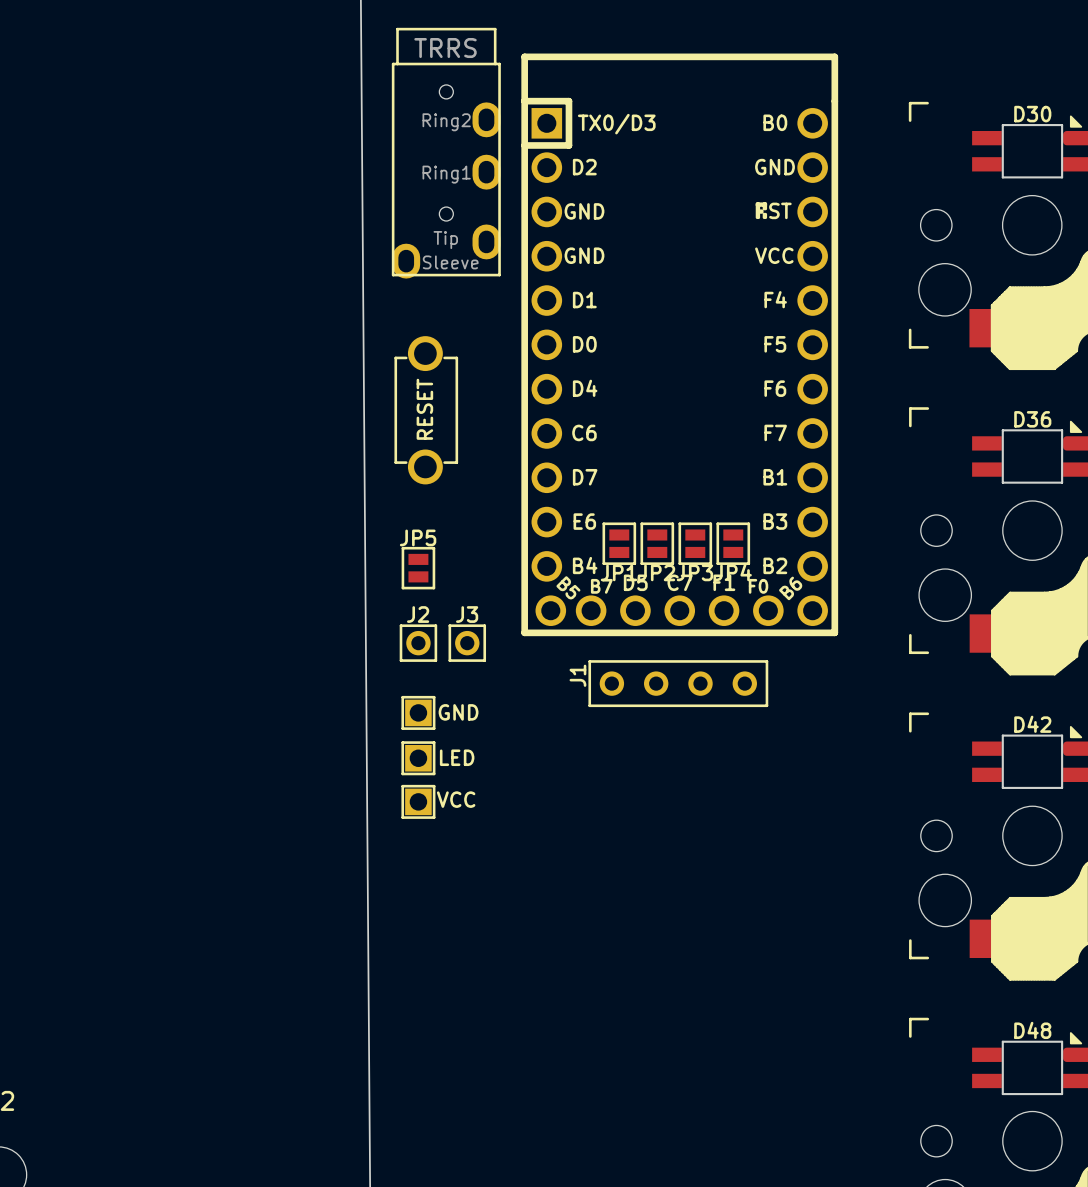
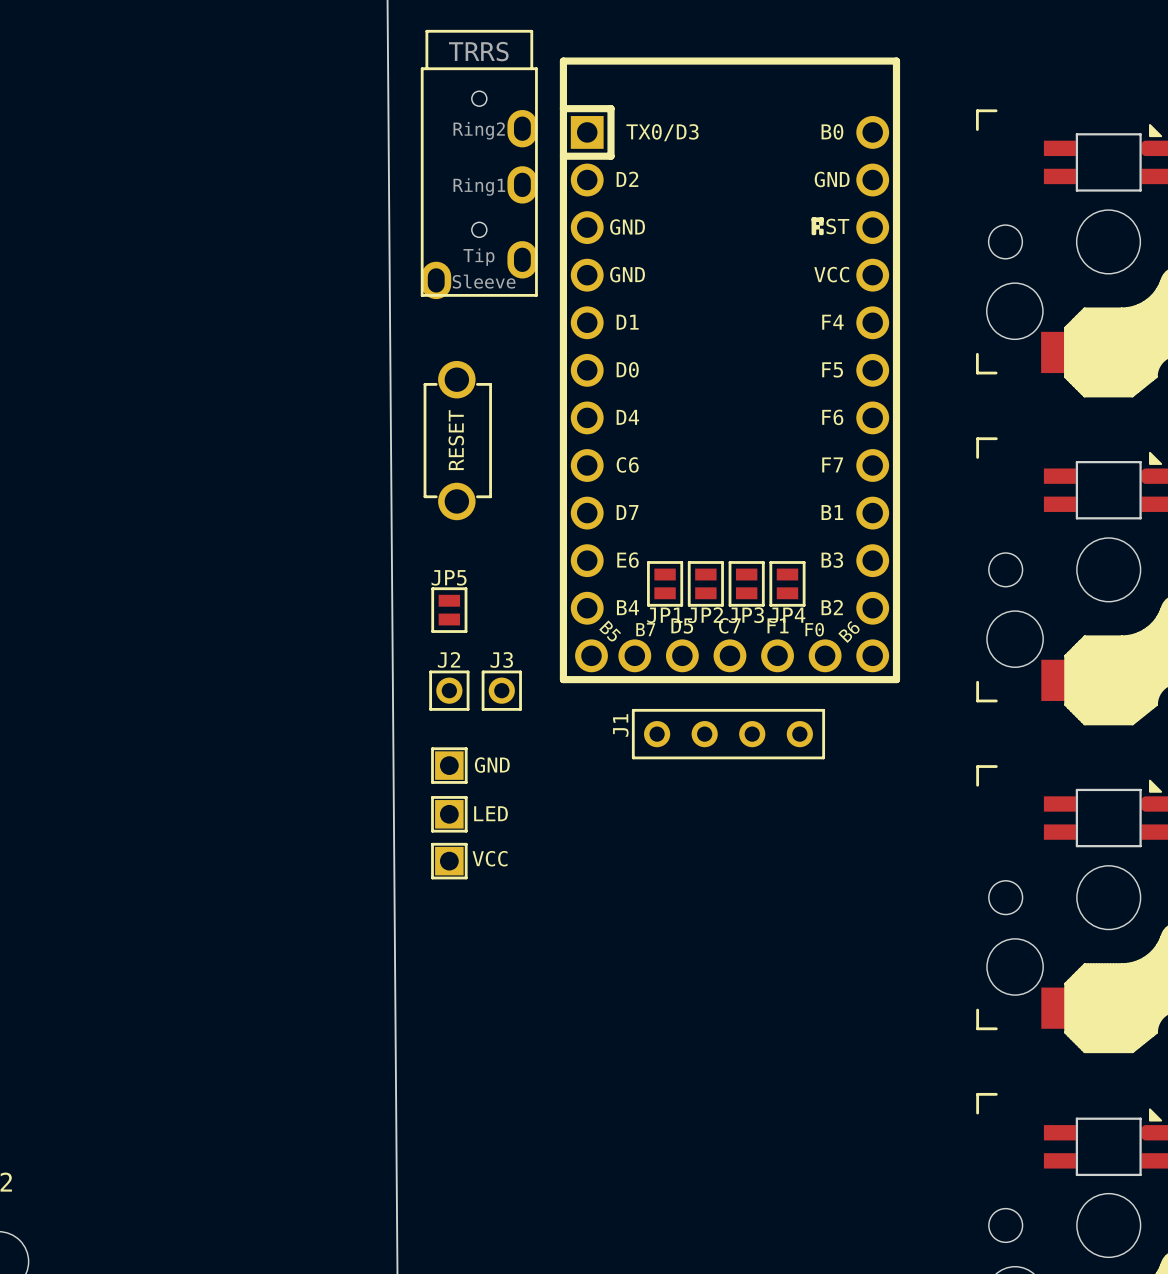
D30 name: D30 (1032, 114) -> none
D36 name: D36 (1032, 419) -> none
D42 name: D42 (1032, 724) -> none
D48 name: D48 (1032, 1030) -> none

